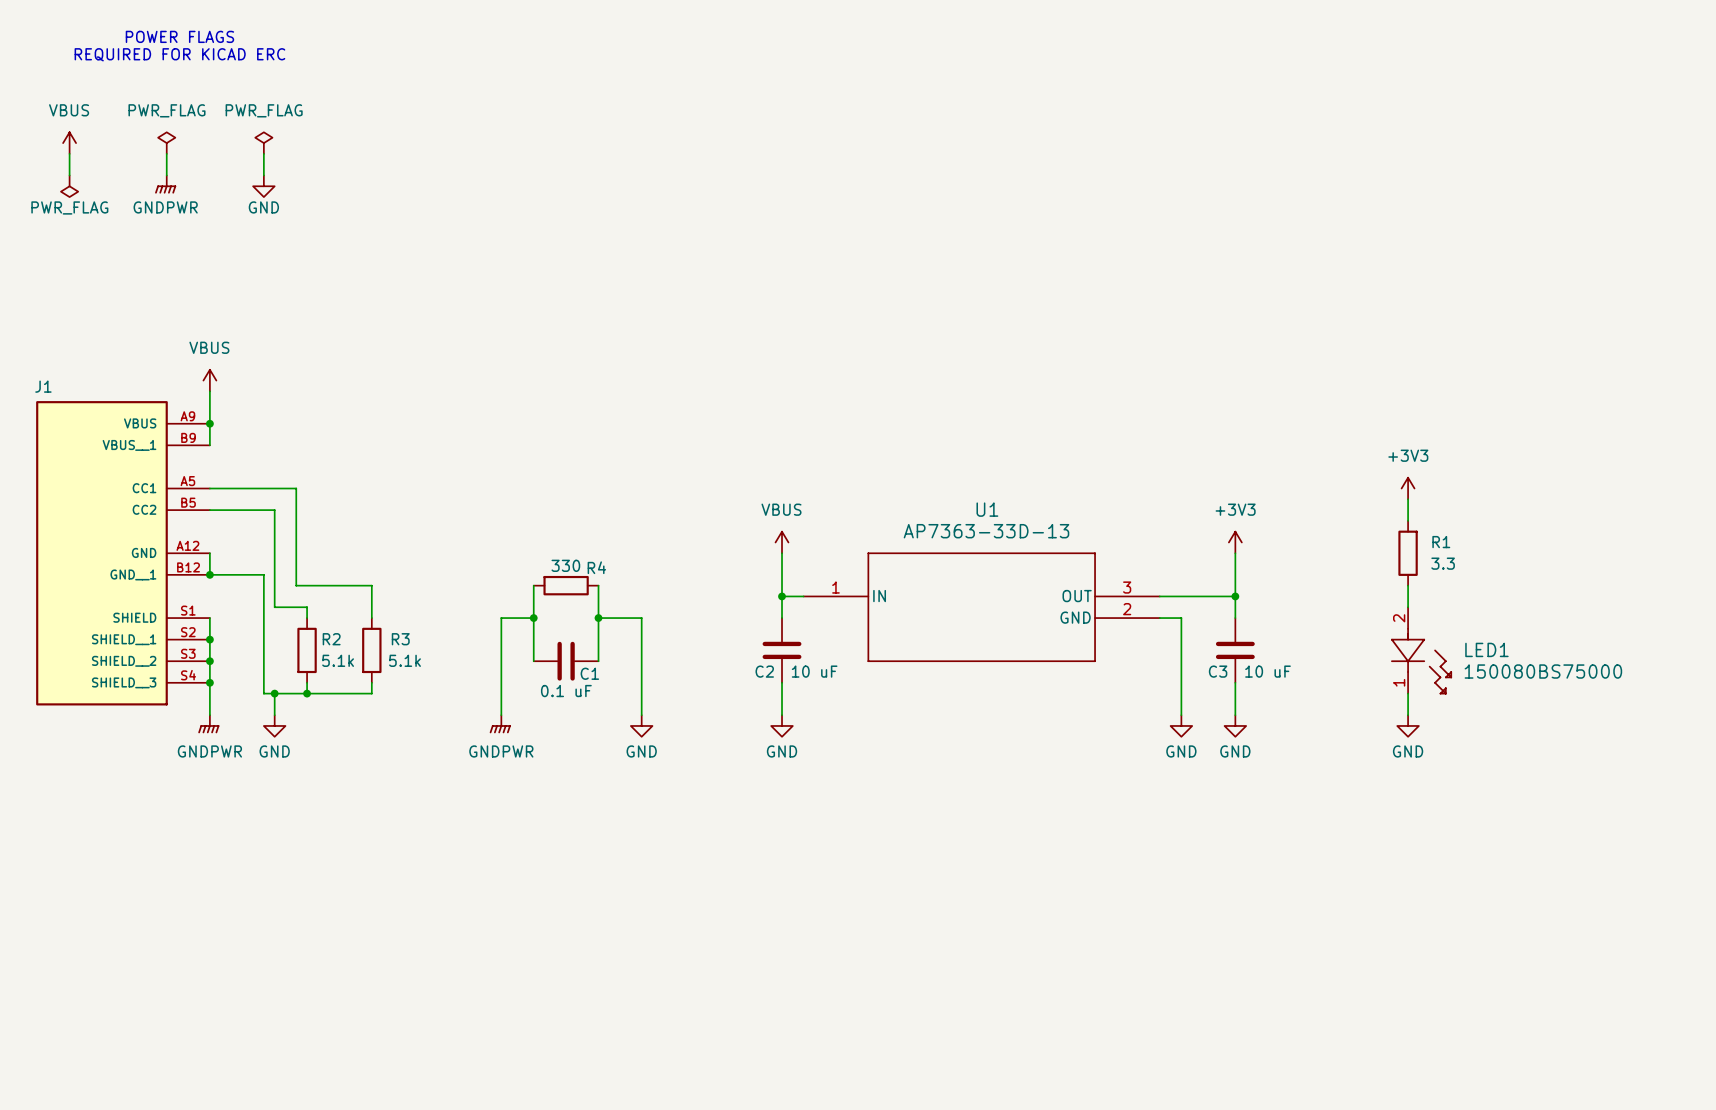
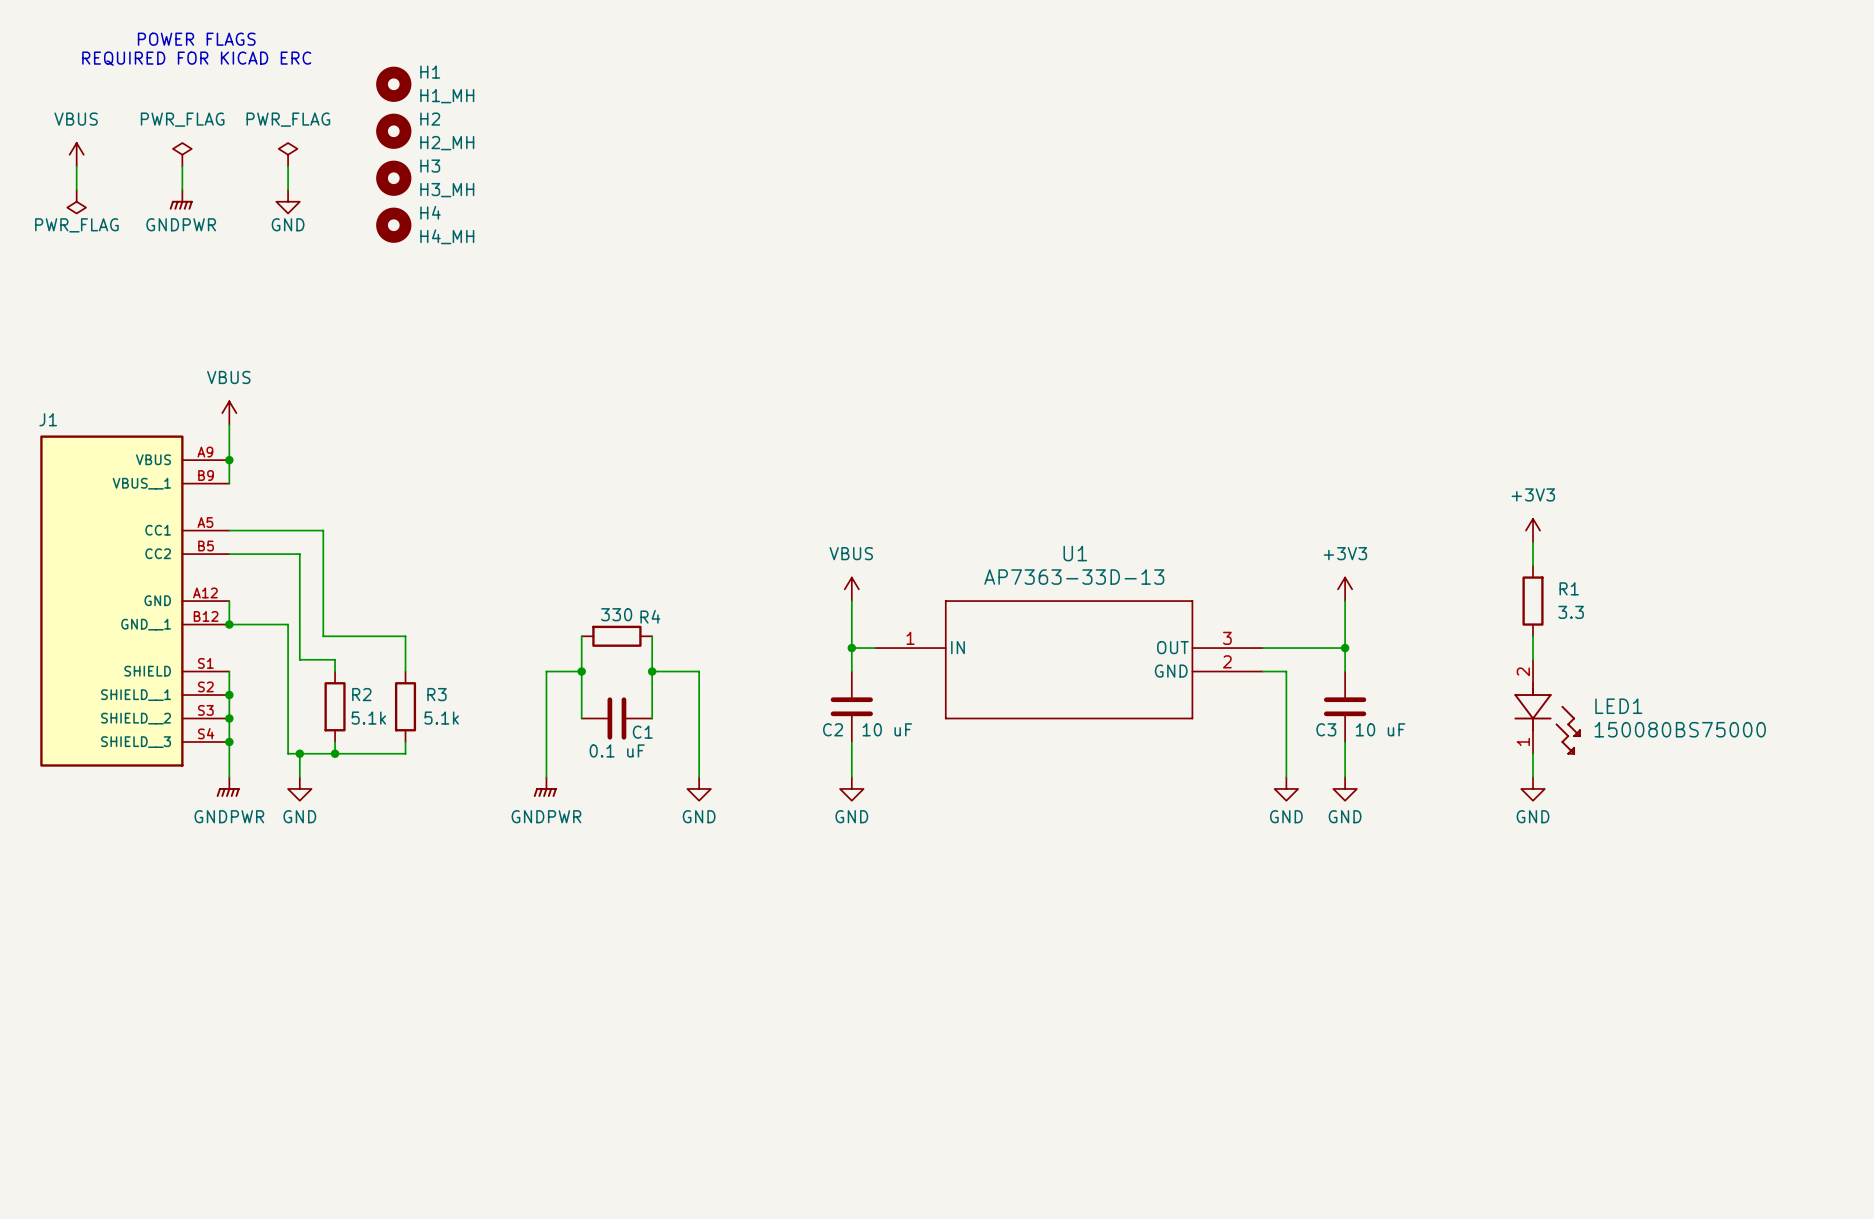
H1: none -> H1_MH (393, 84)
H2: none -> H2_MH (393, 131)
H3: none -> H3_MH (393, 178)
H4: none -> H4_MH (393, 225)

